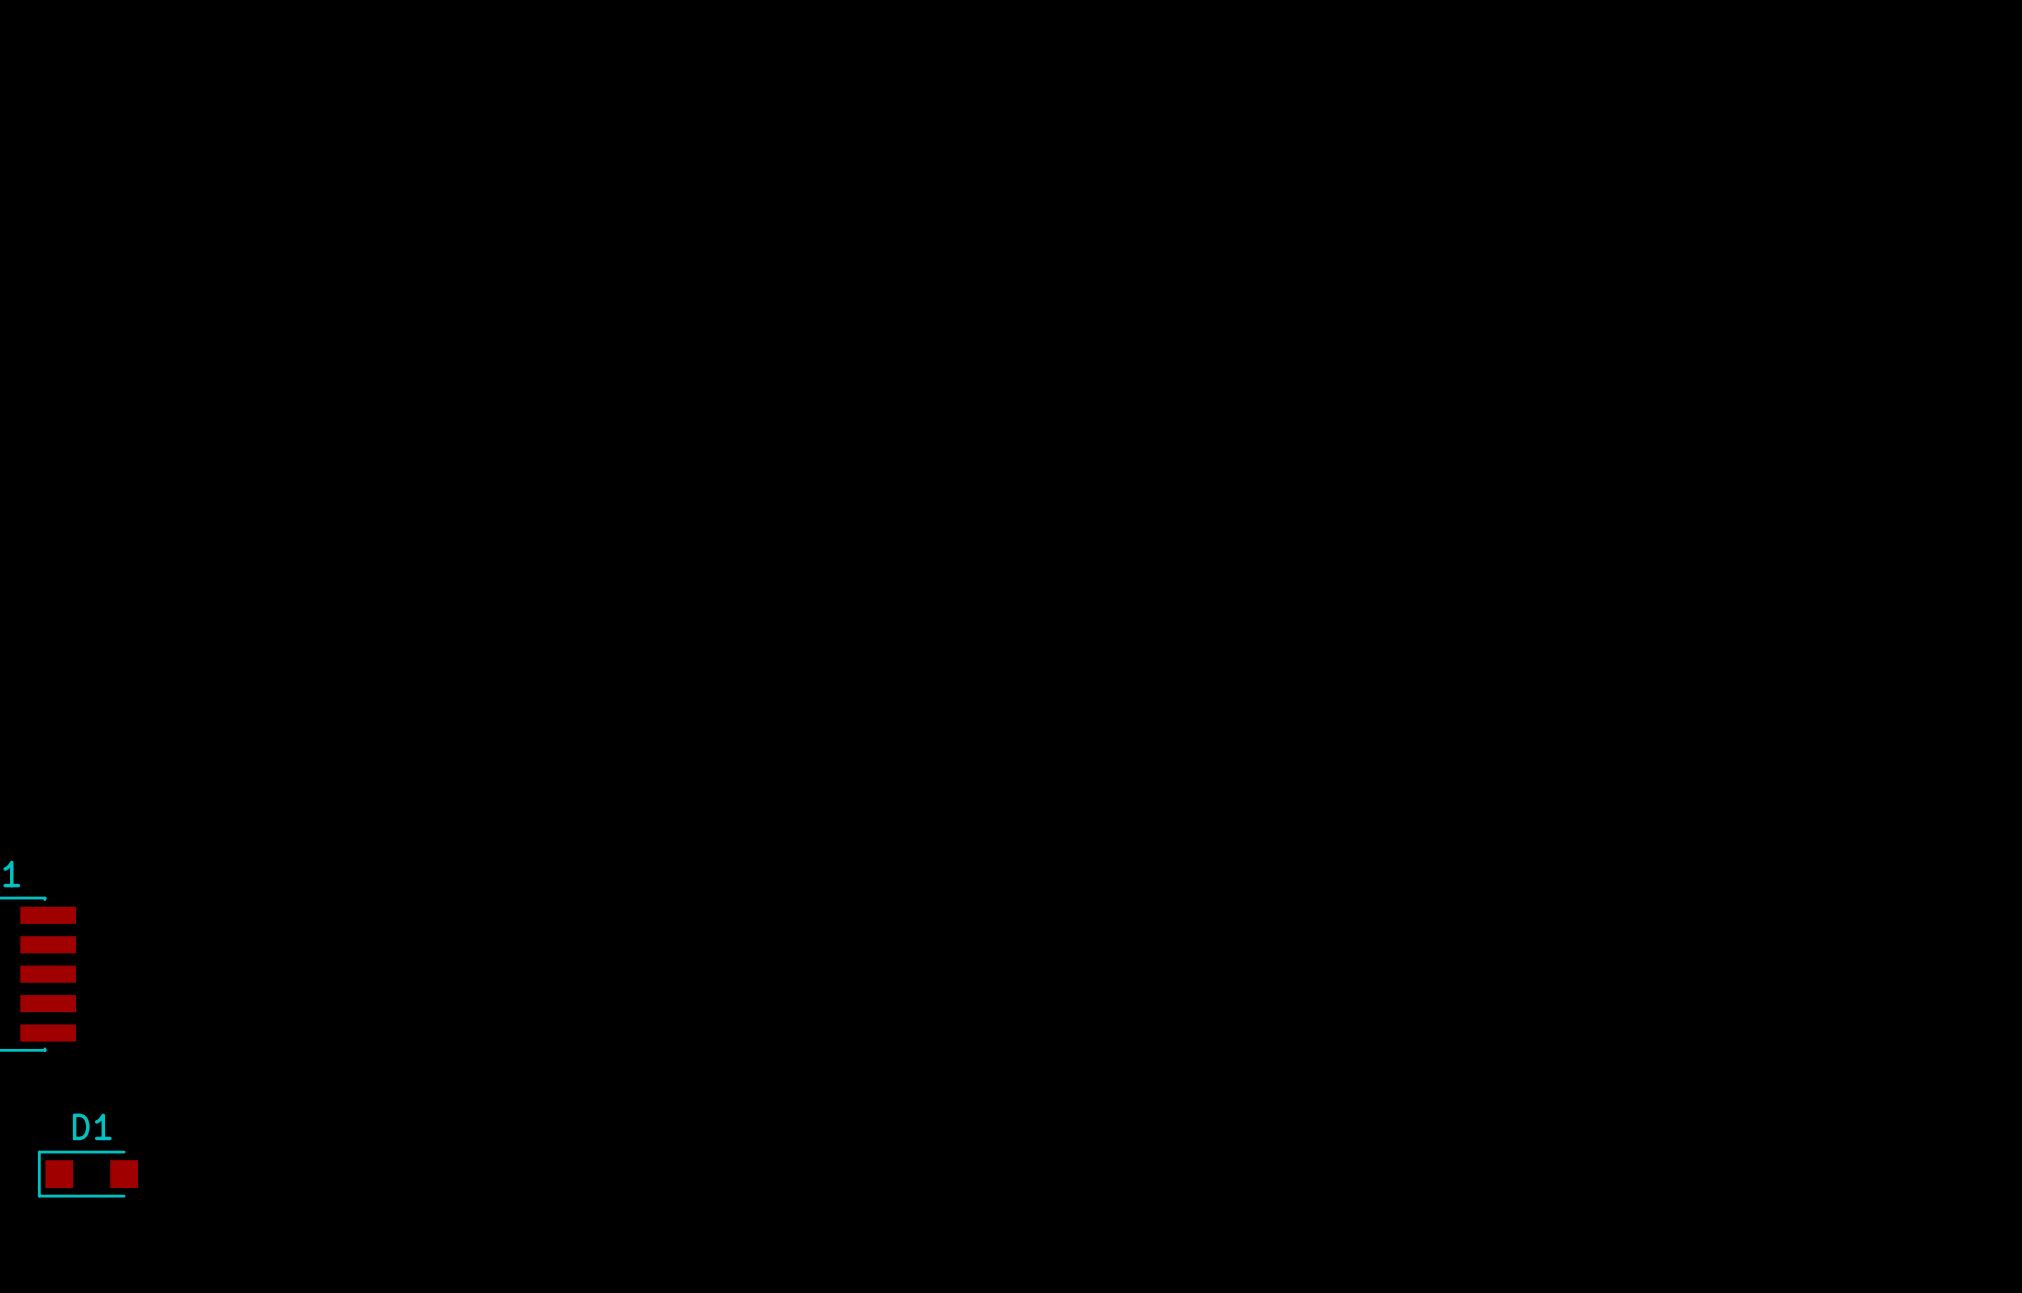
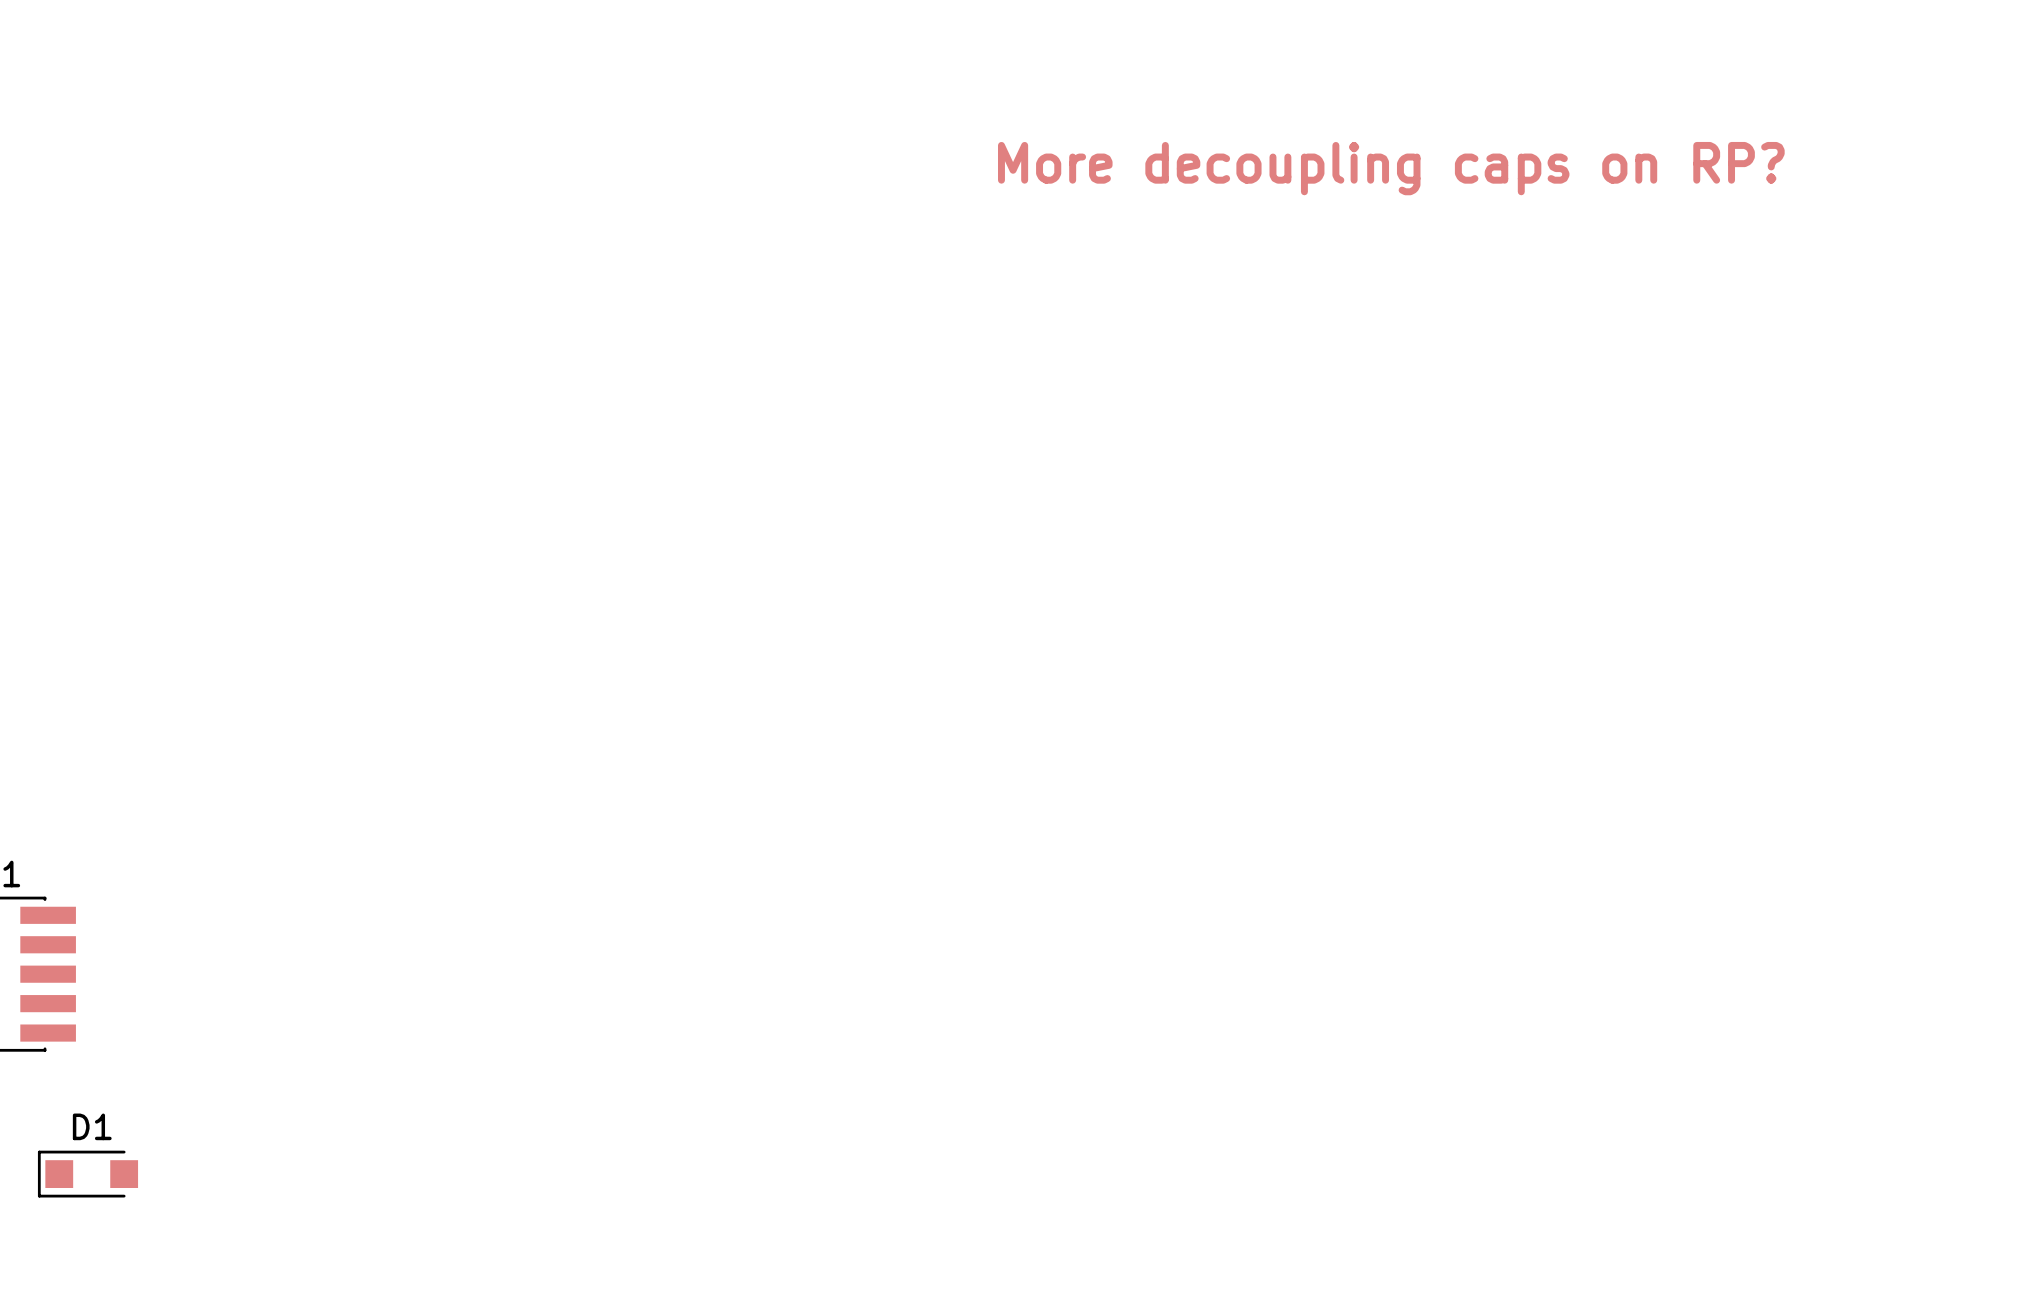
text: none -> More decoupling caps on RP? (1391, 168)

